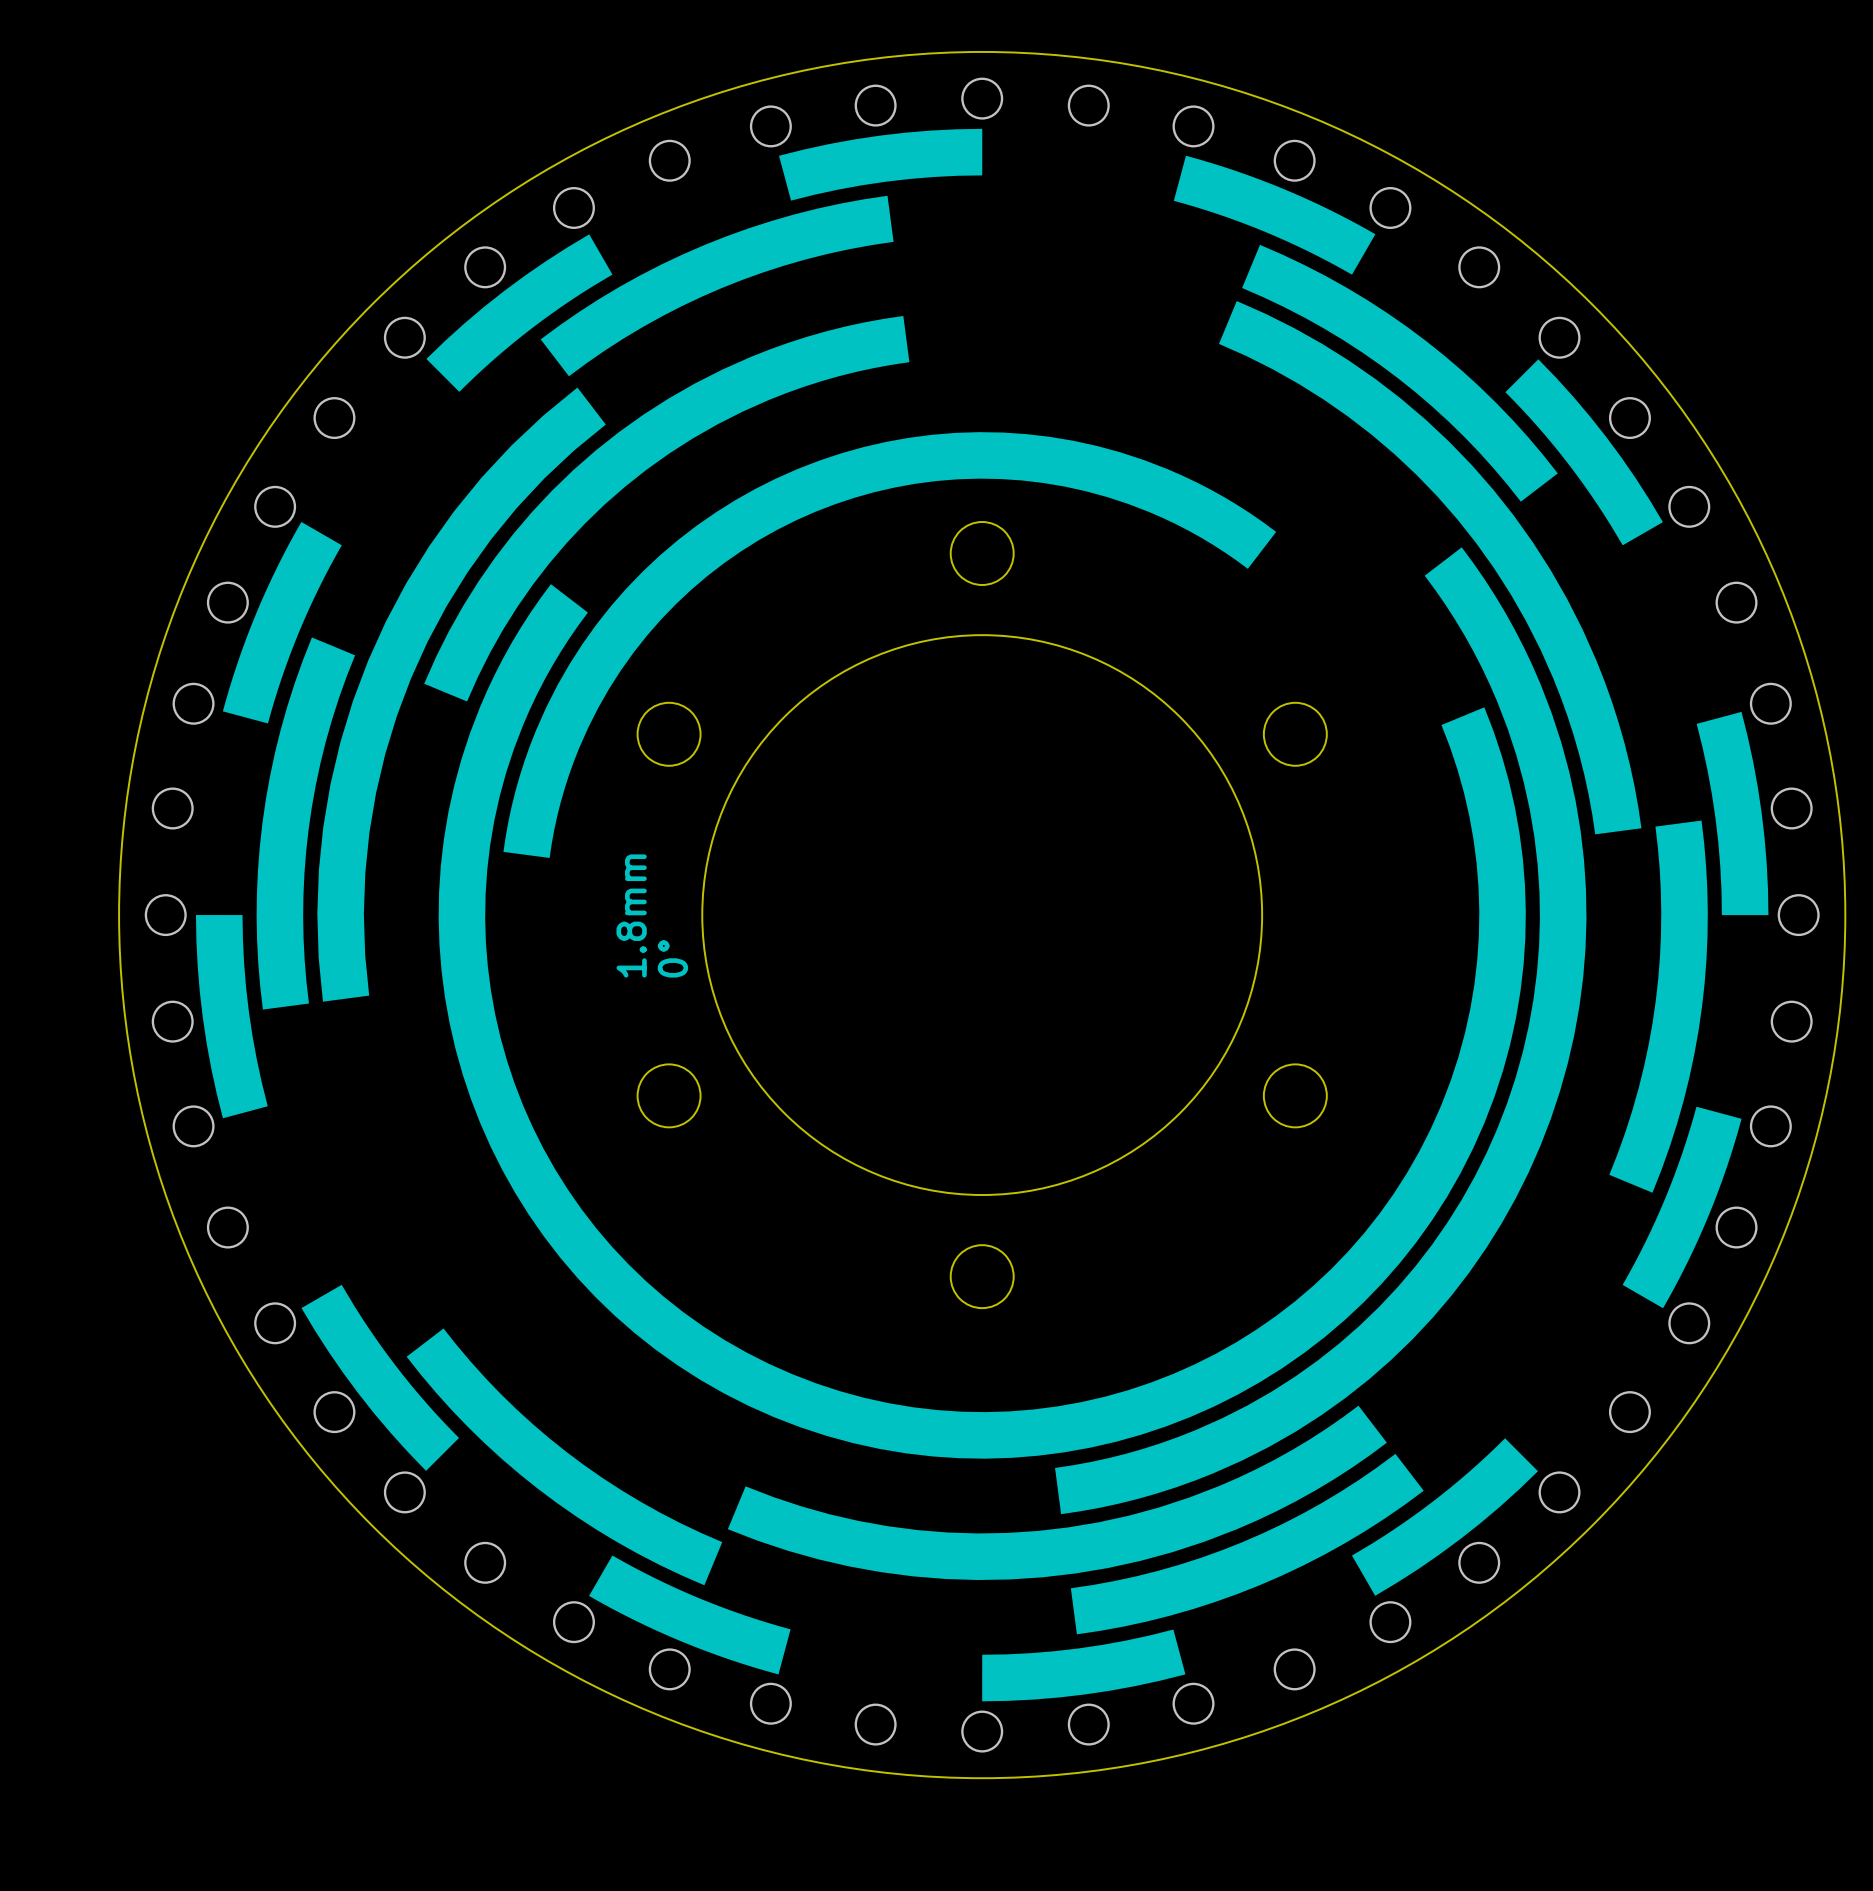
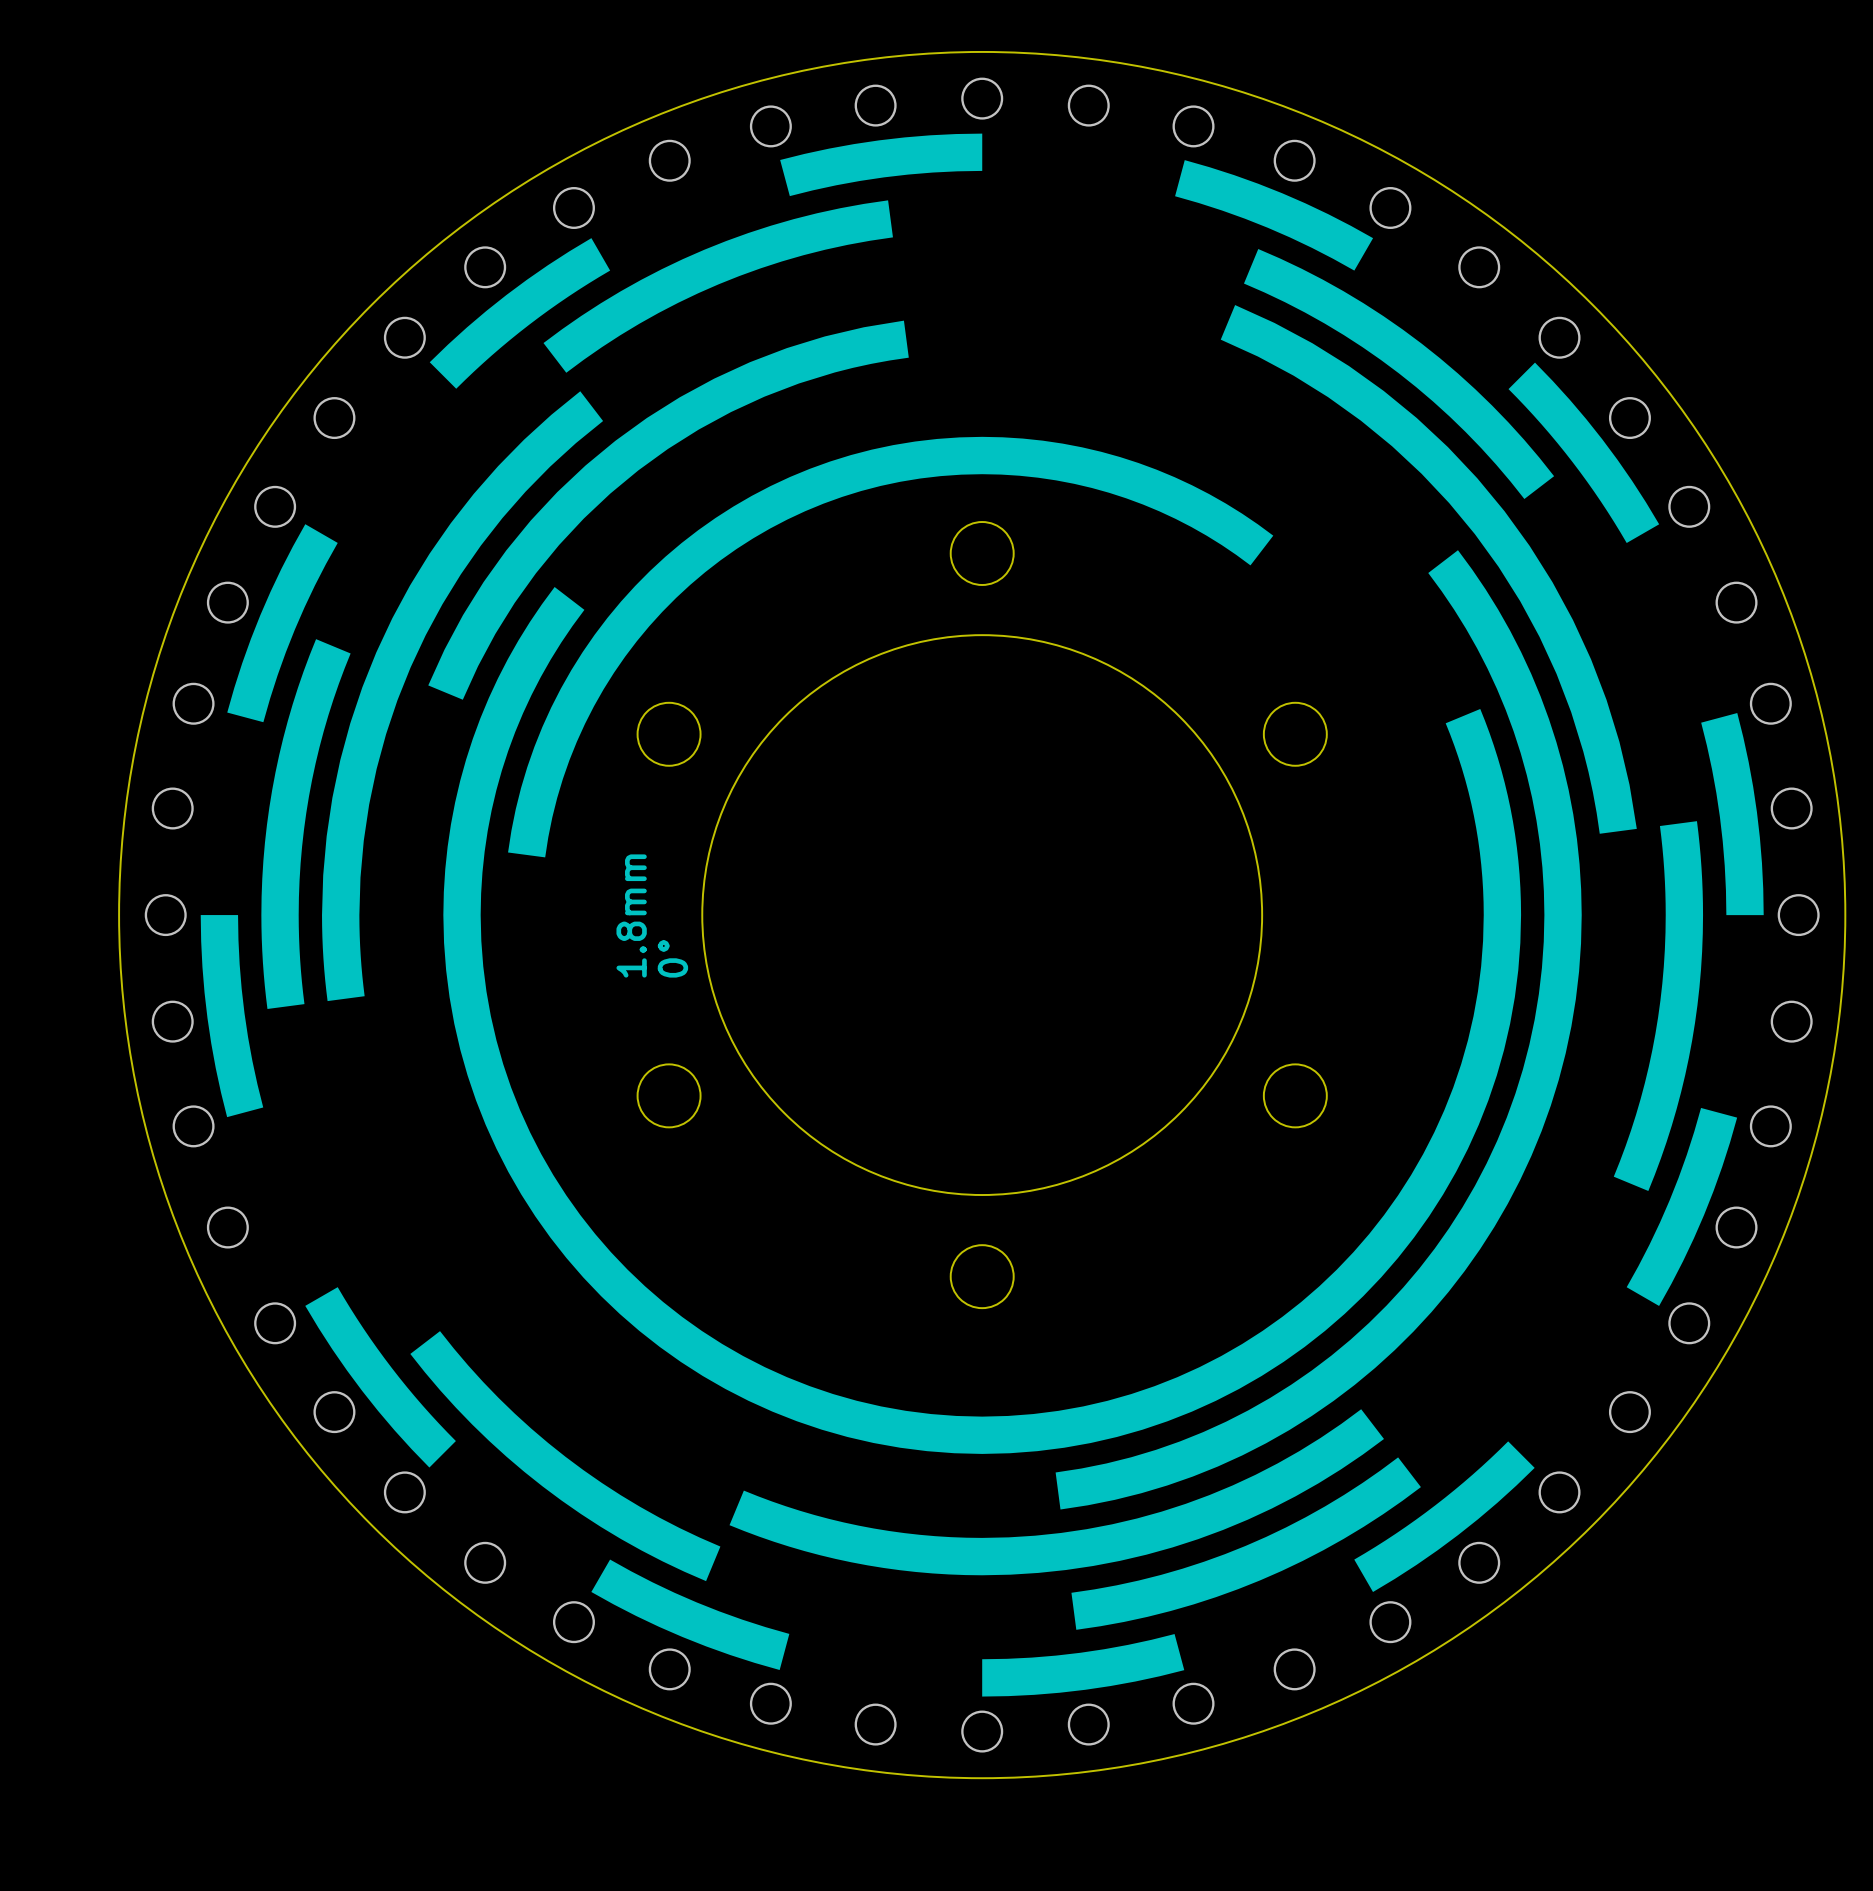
drawing shape: [195, 128, 1769, 1702] -> [200, 133, 1764, 1697]

